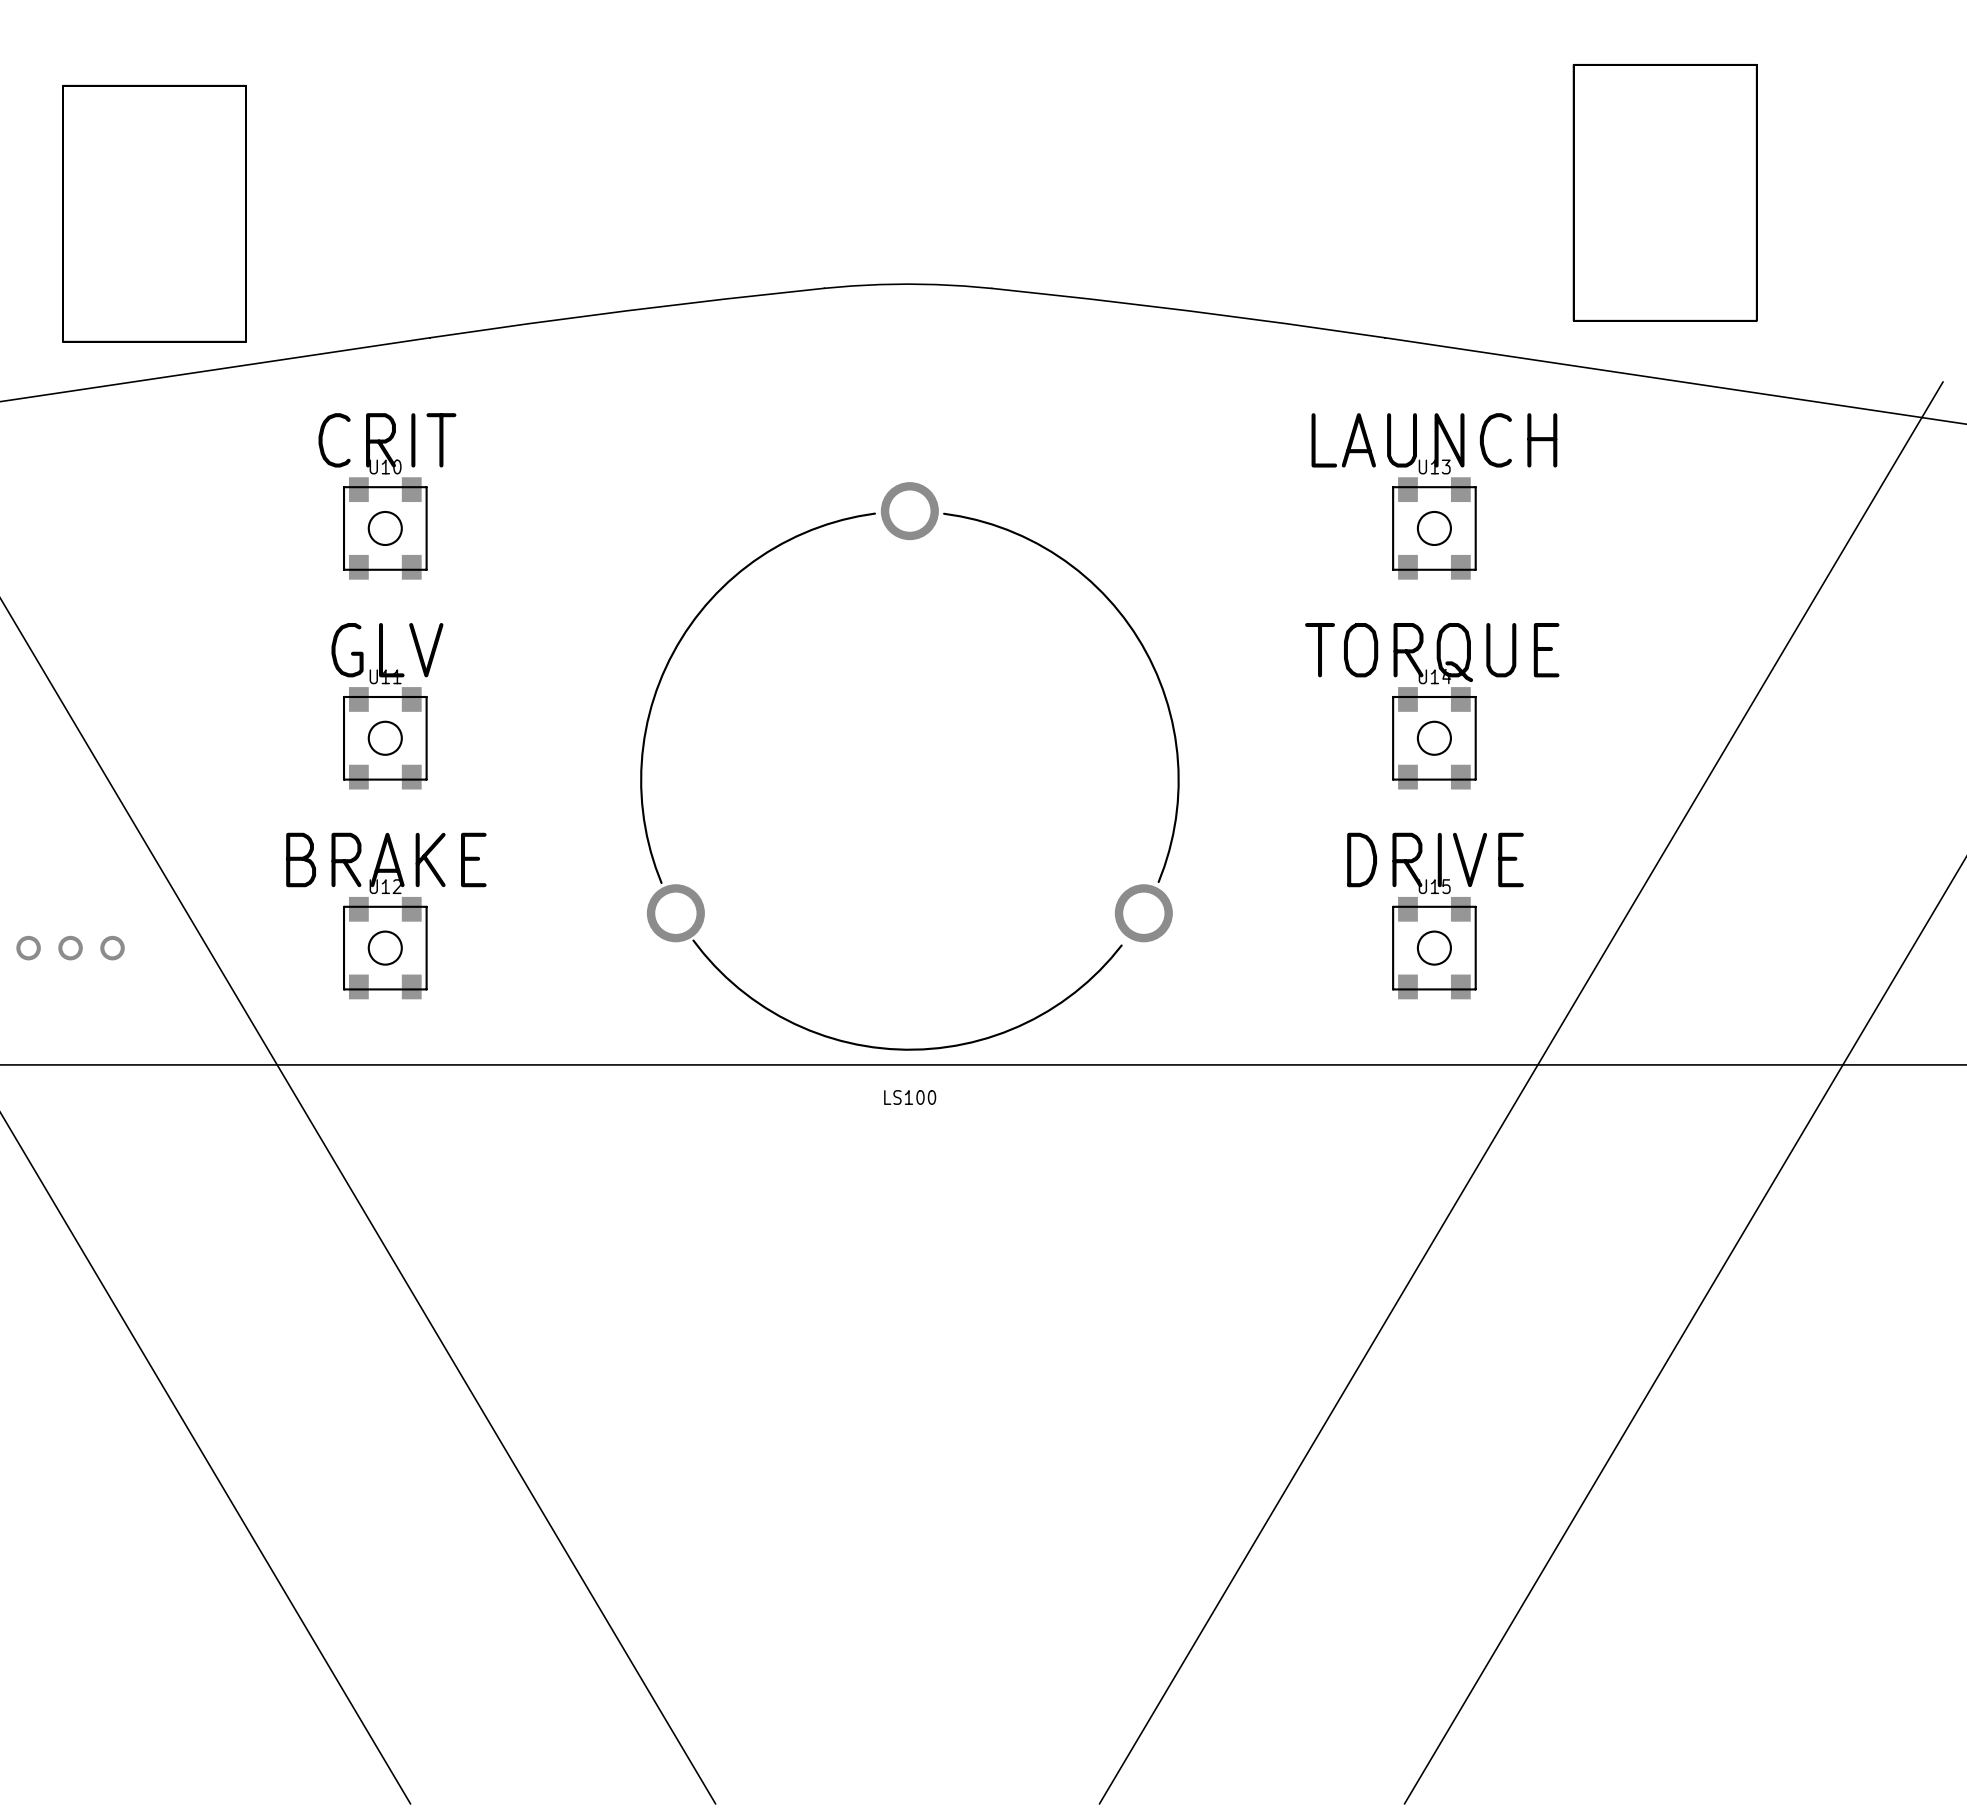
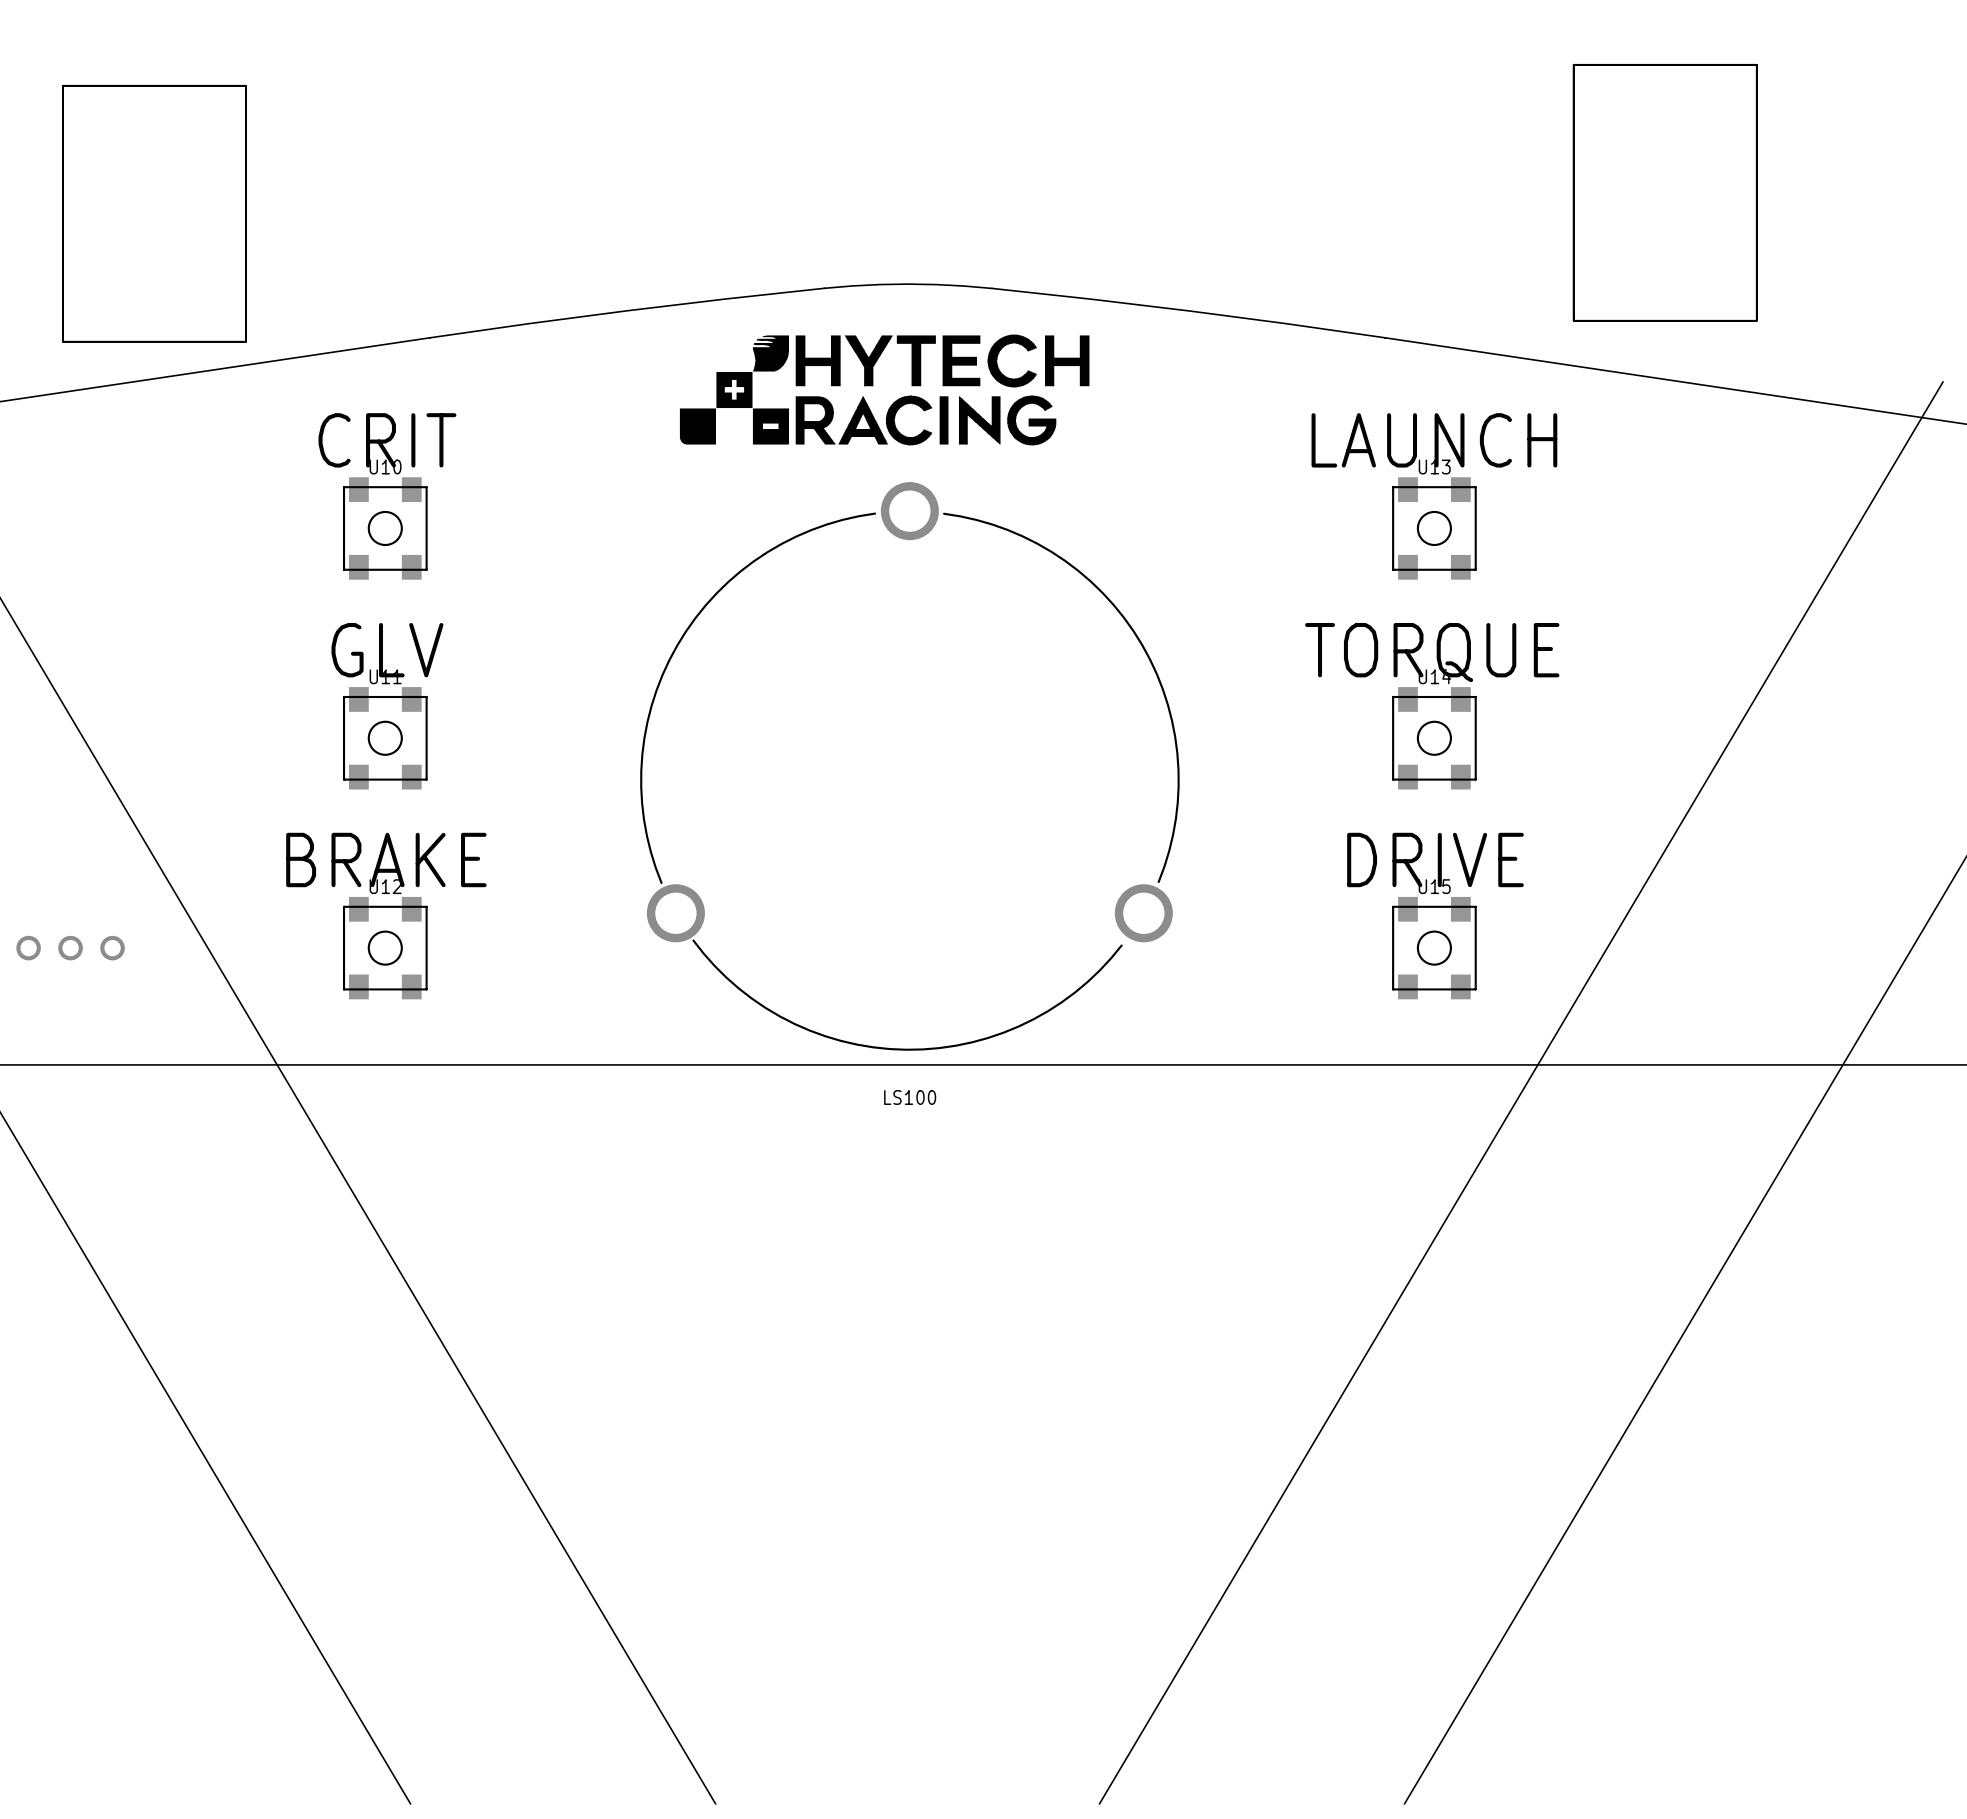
drawing: none -> [679, 334, 1090, 446]

